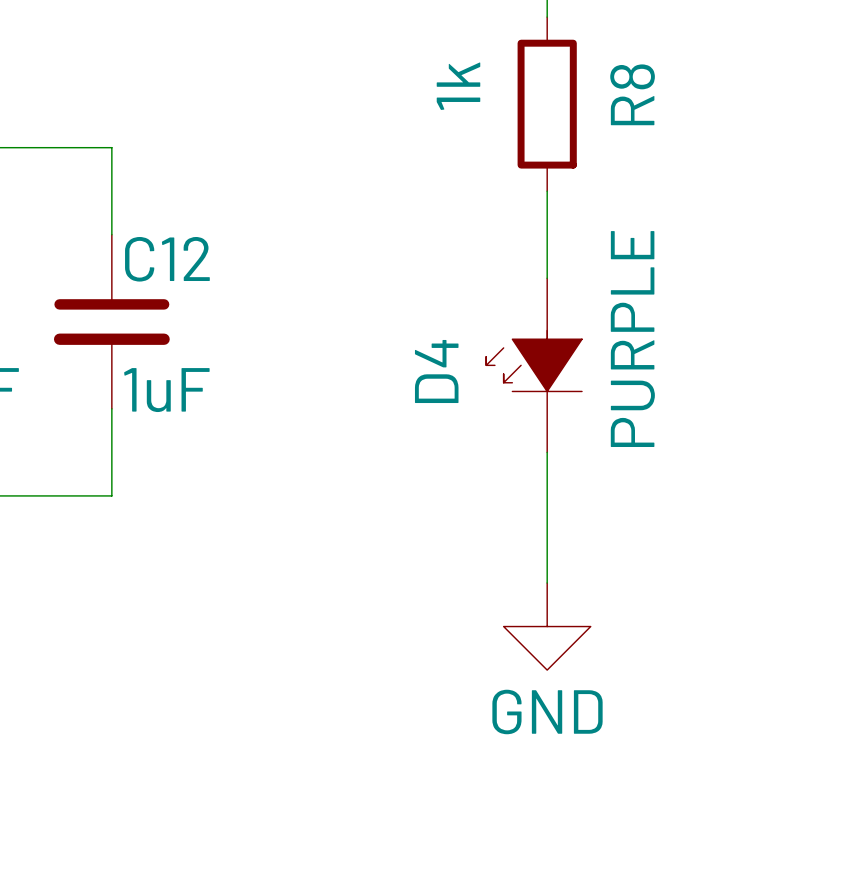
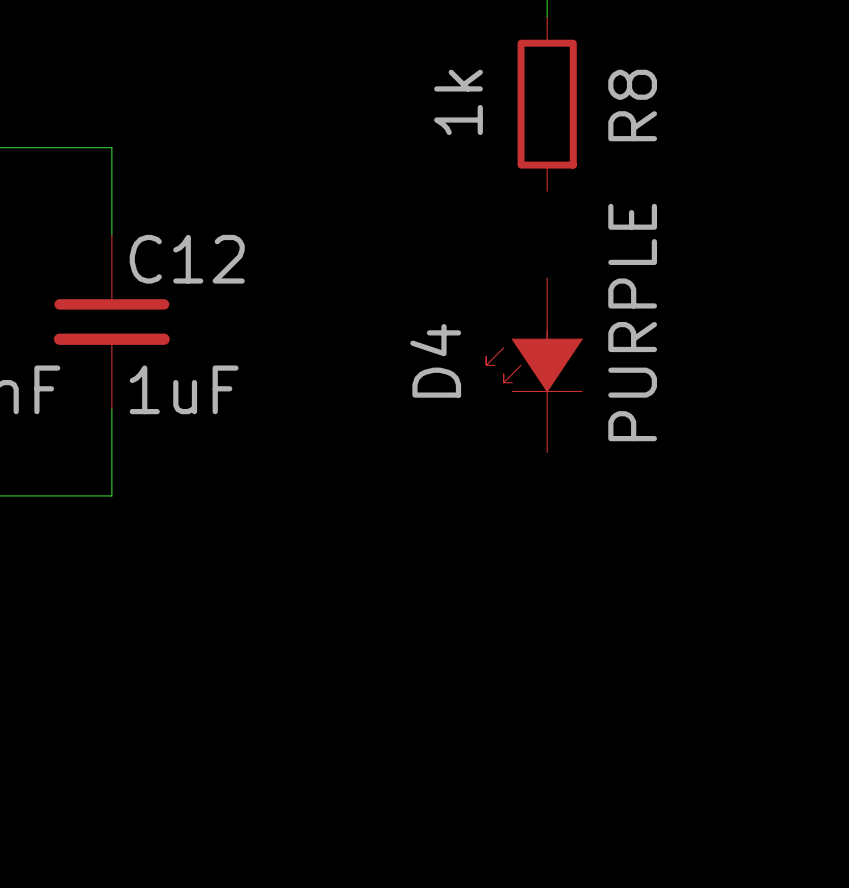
wire: (547, 191) (547, 278) -> none
wire: (547, 452) (547, 583) -> none
power symbol: GND (547, 626) -> none

